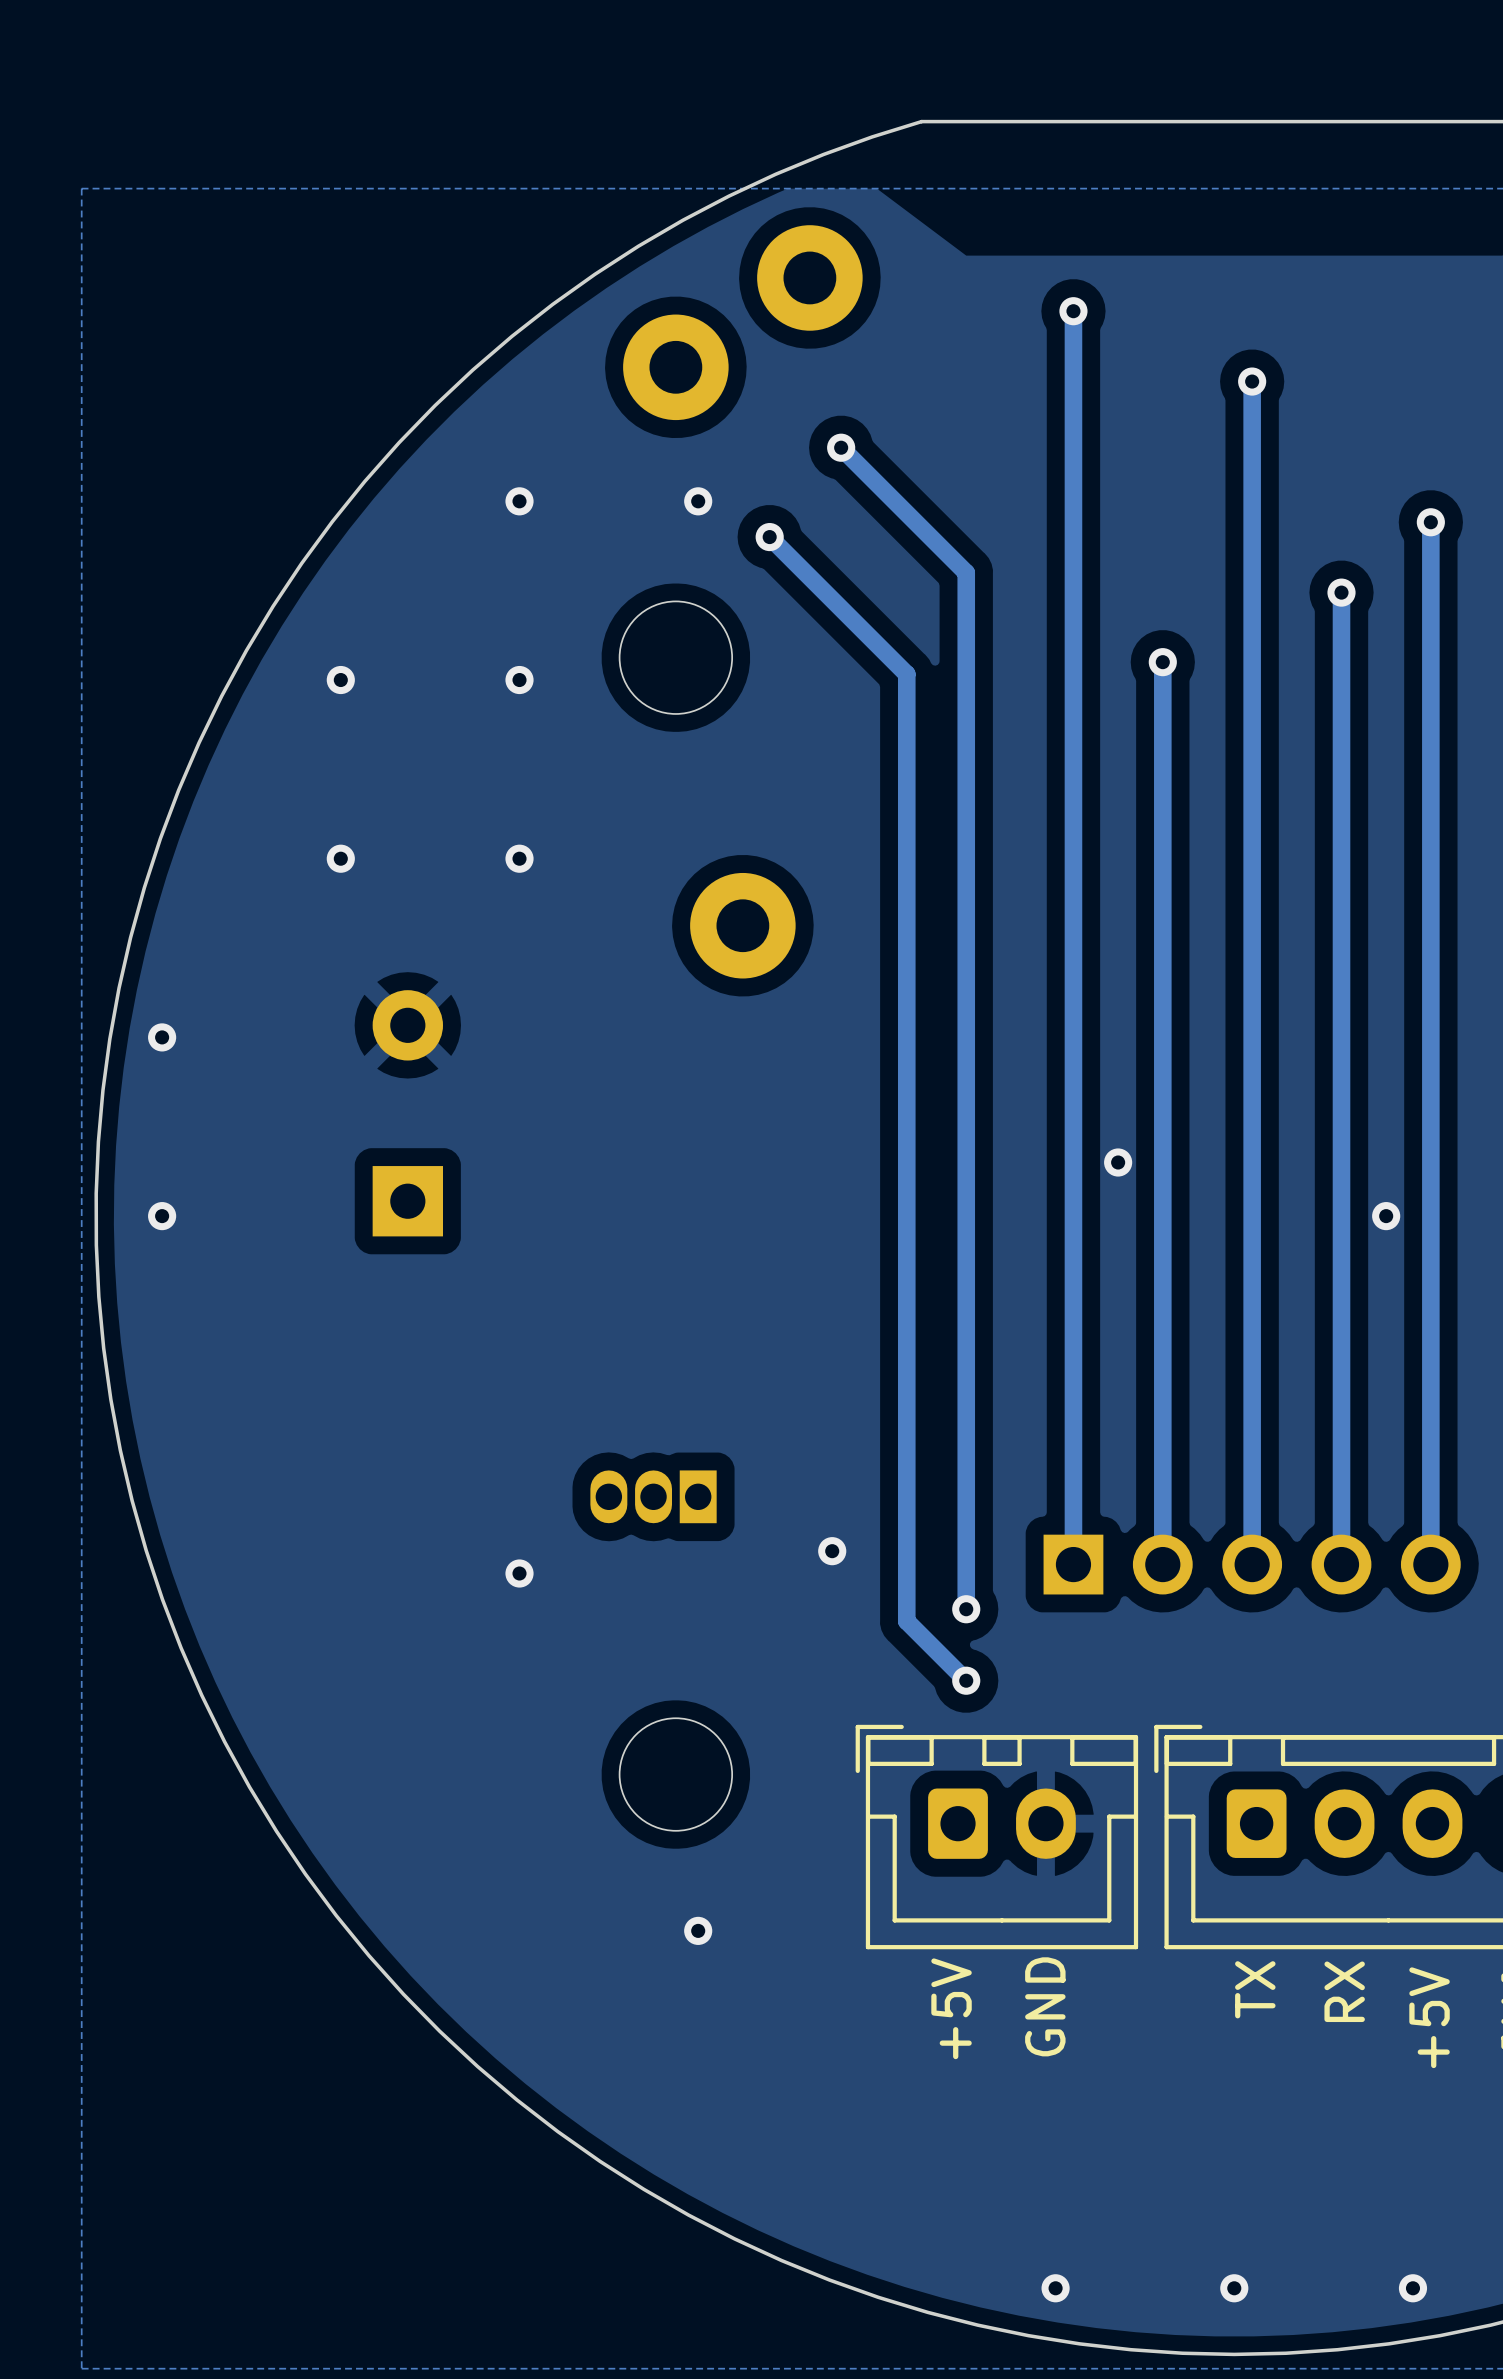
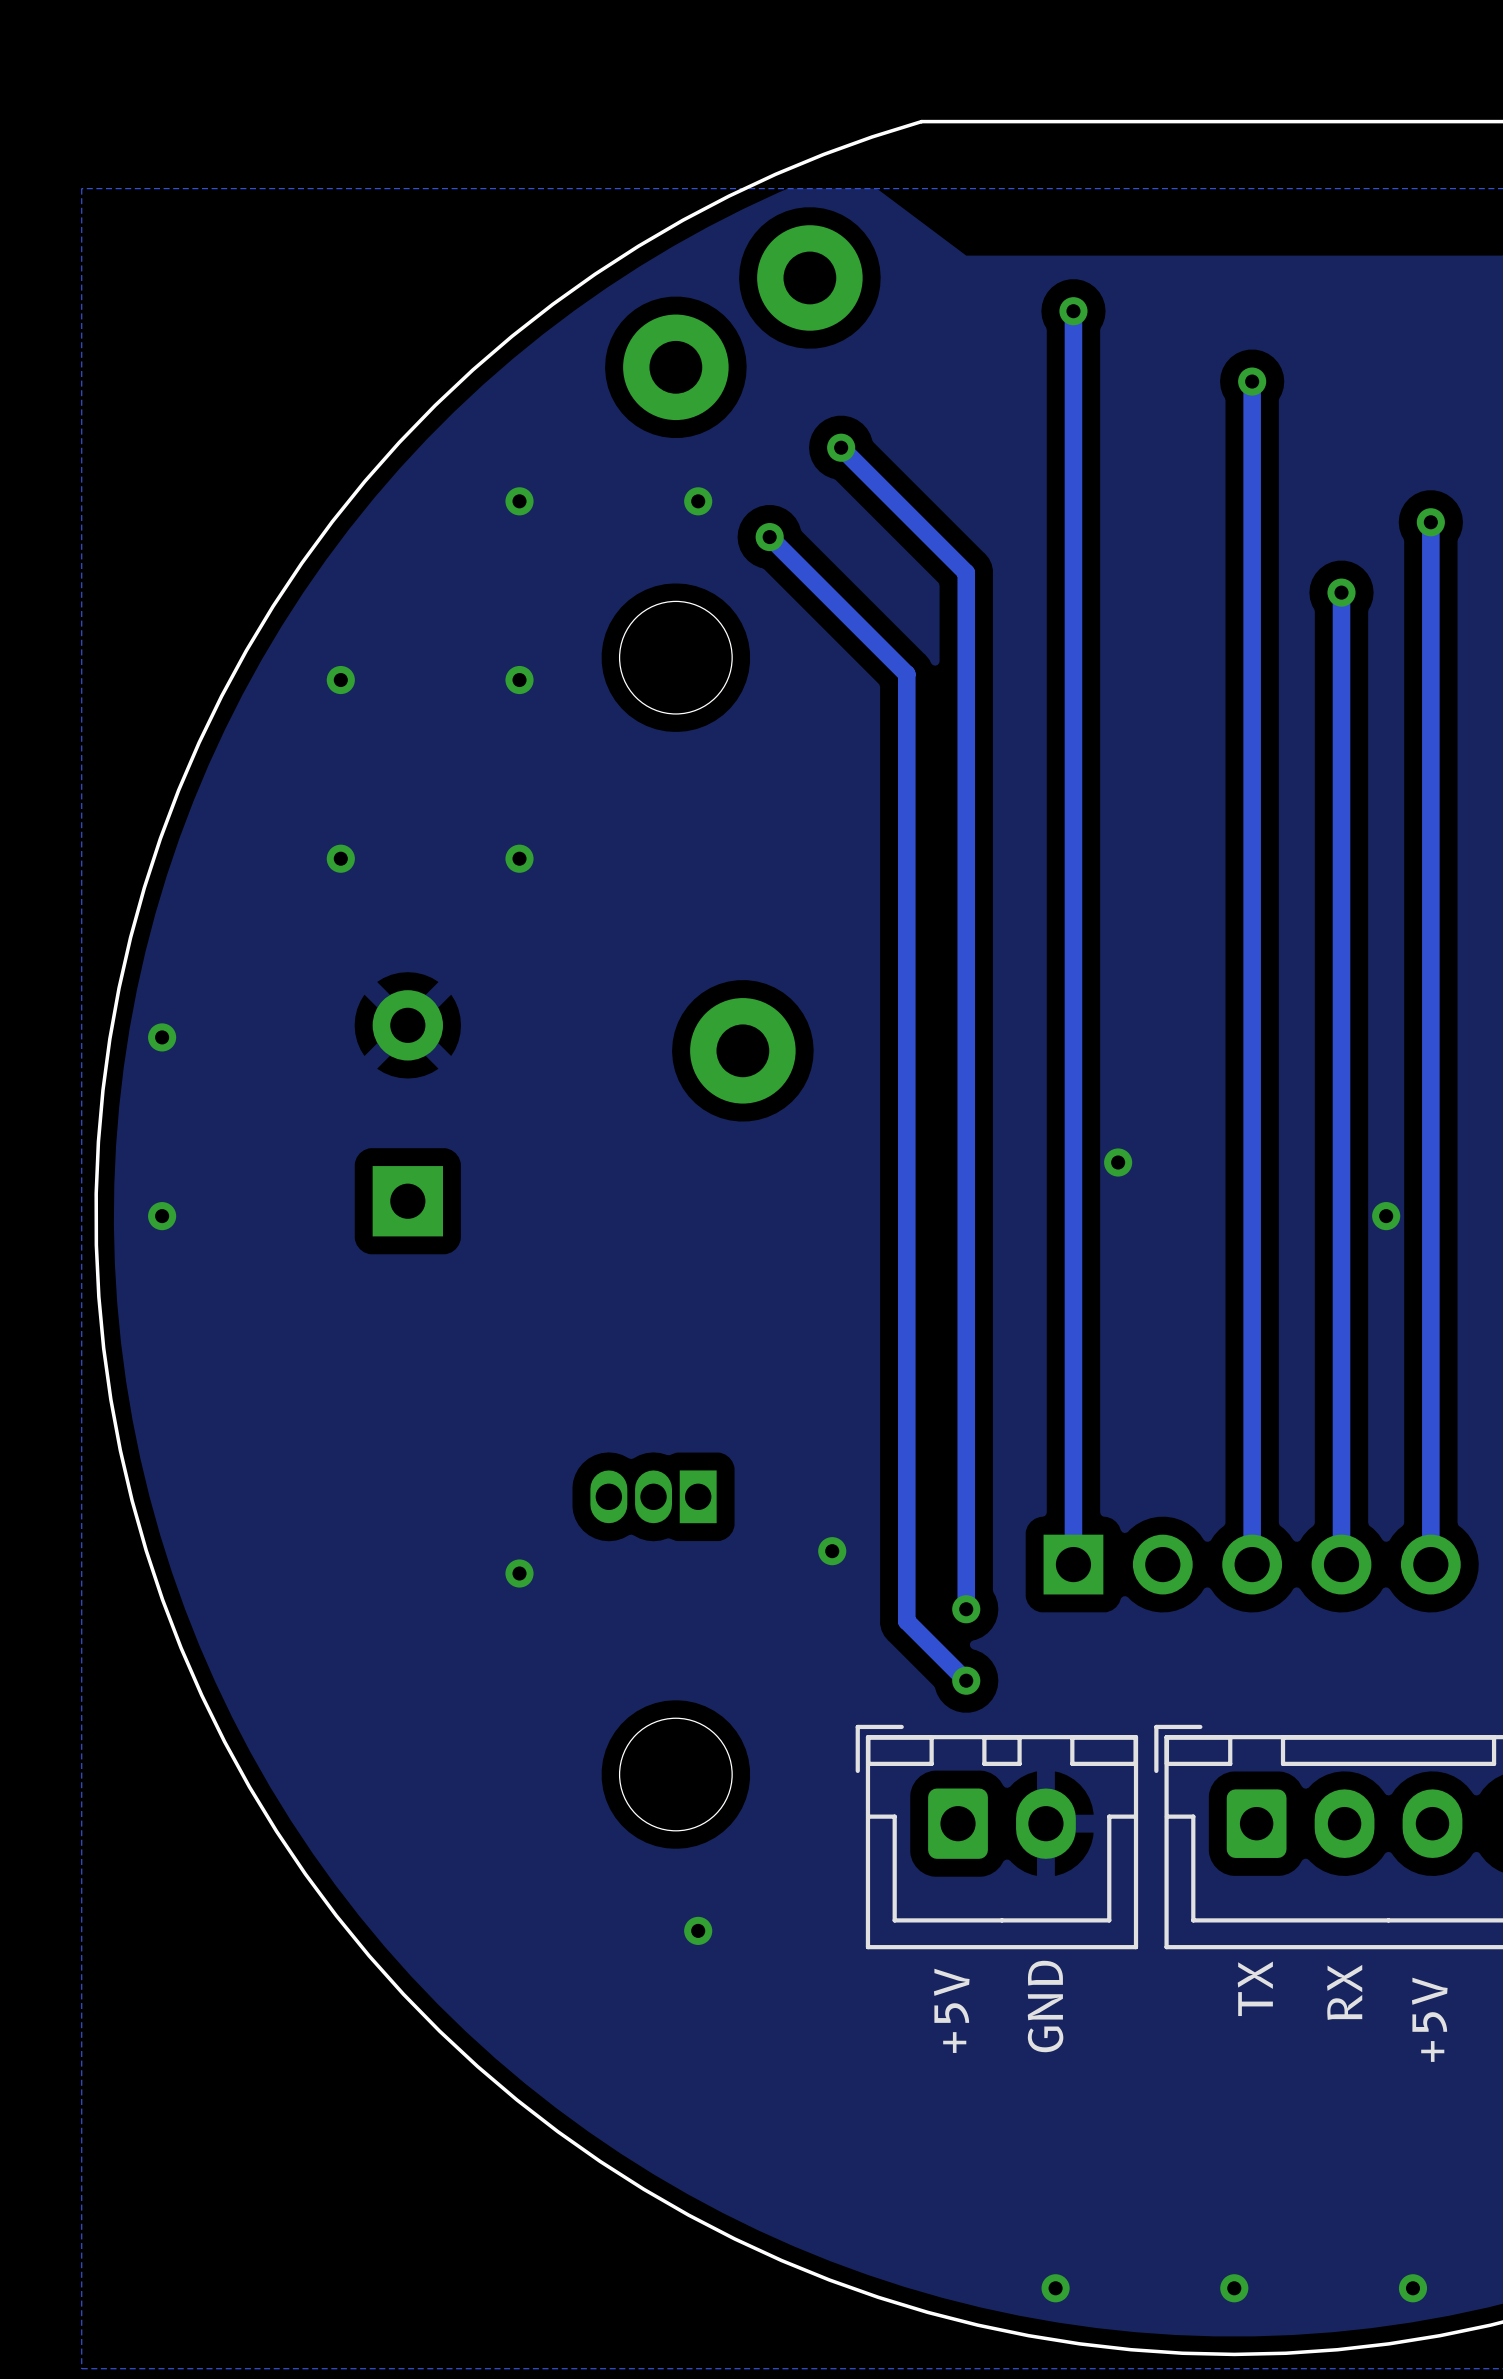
track: (1162, 662) (1162, 1555) -> none
via: (1162, 662) -> none
part position: (742, 925) -> (742, 1050)

